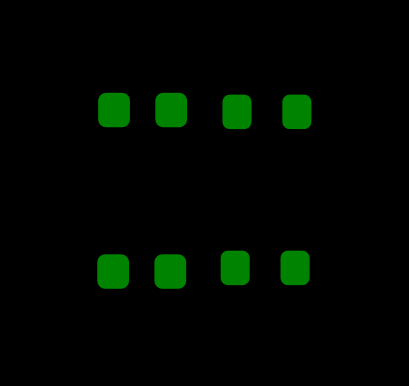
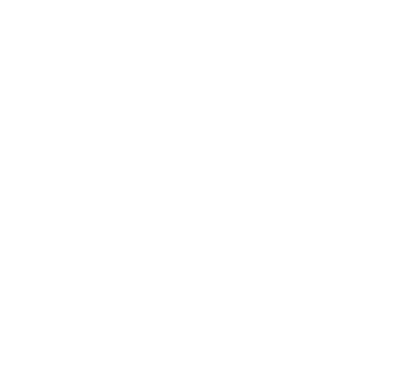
part: (142, 110) -> none
part: (266, 111) -> none
part: (265, 267) -> none
part: (141, 271) -> none

